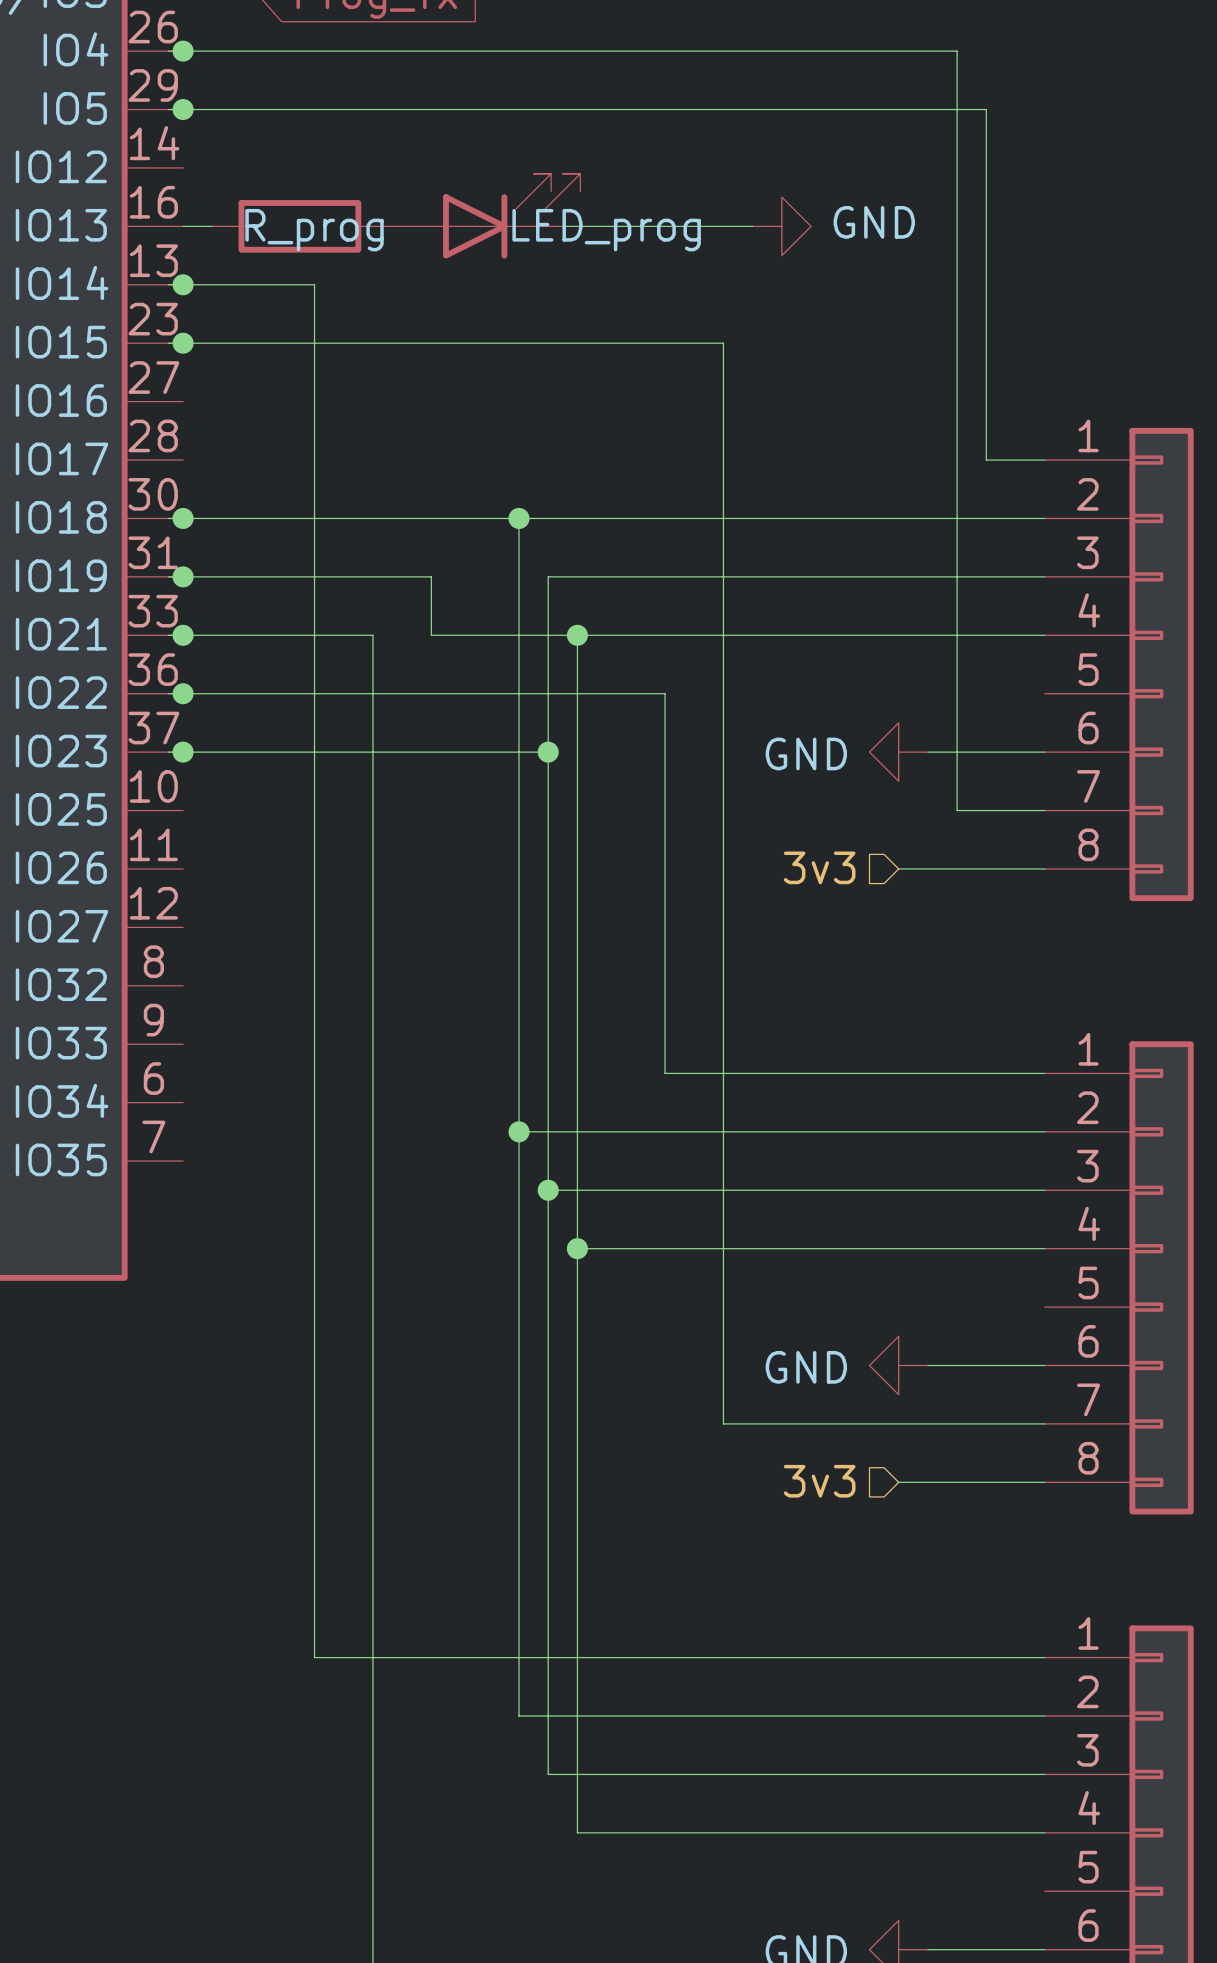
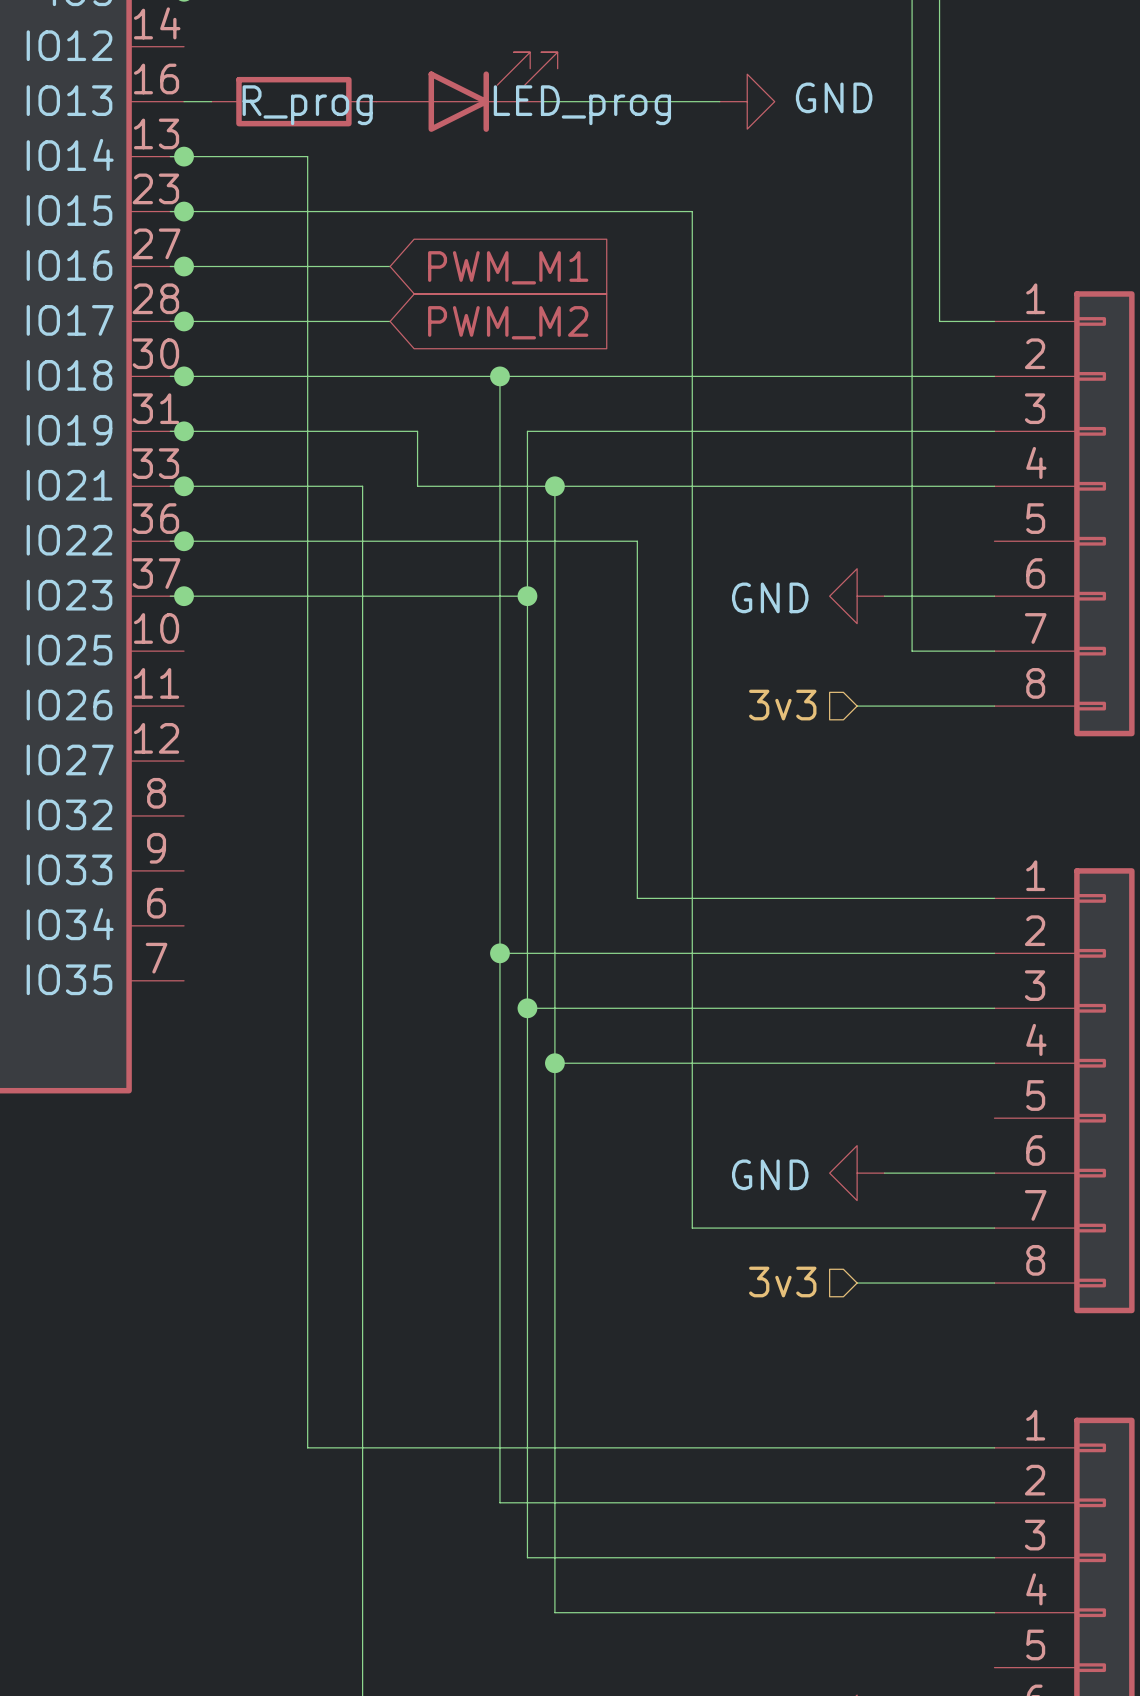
wire: none -> (170, 266) (390, 266)
junction: none -> (184, 266)
global label: none -> PWM_M1 (508, 267)
wire: none -> (170, 321) (390, 321)
junction: none -> (184, 321)
global label: none -> PWM_M2 (508, 322)

